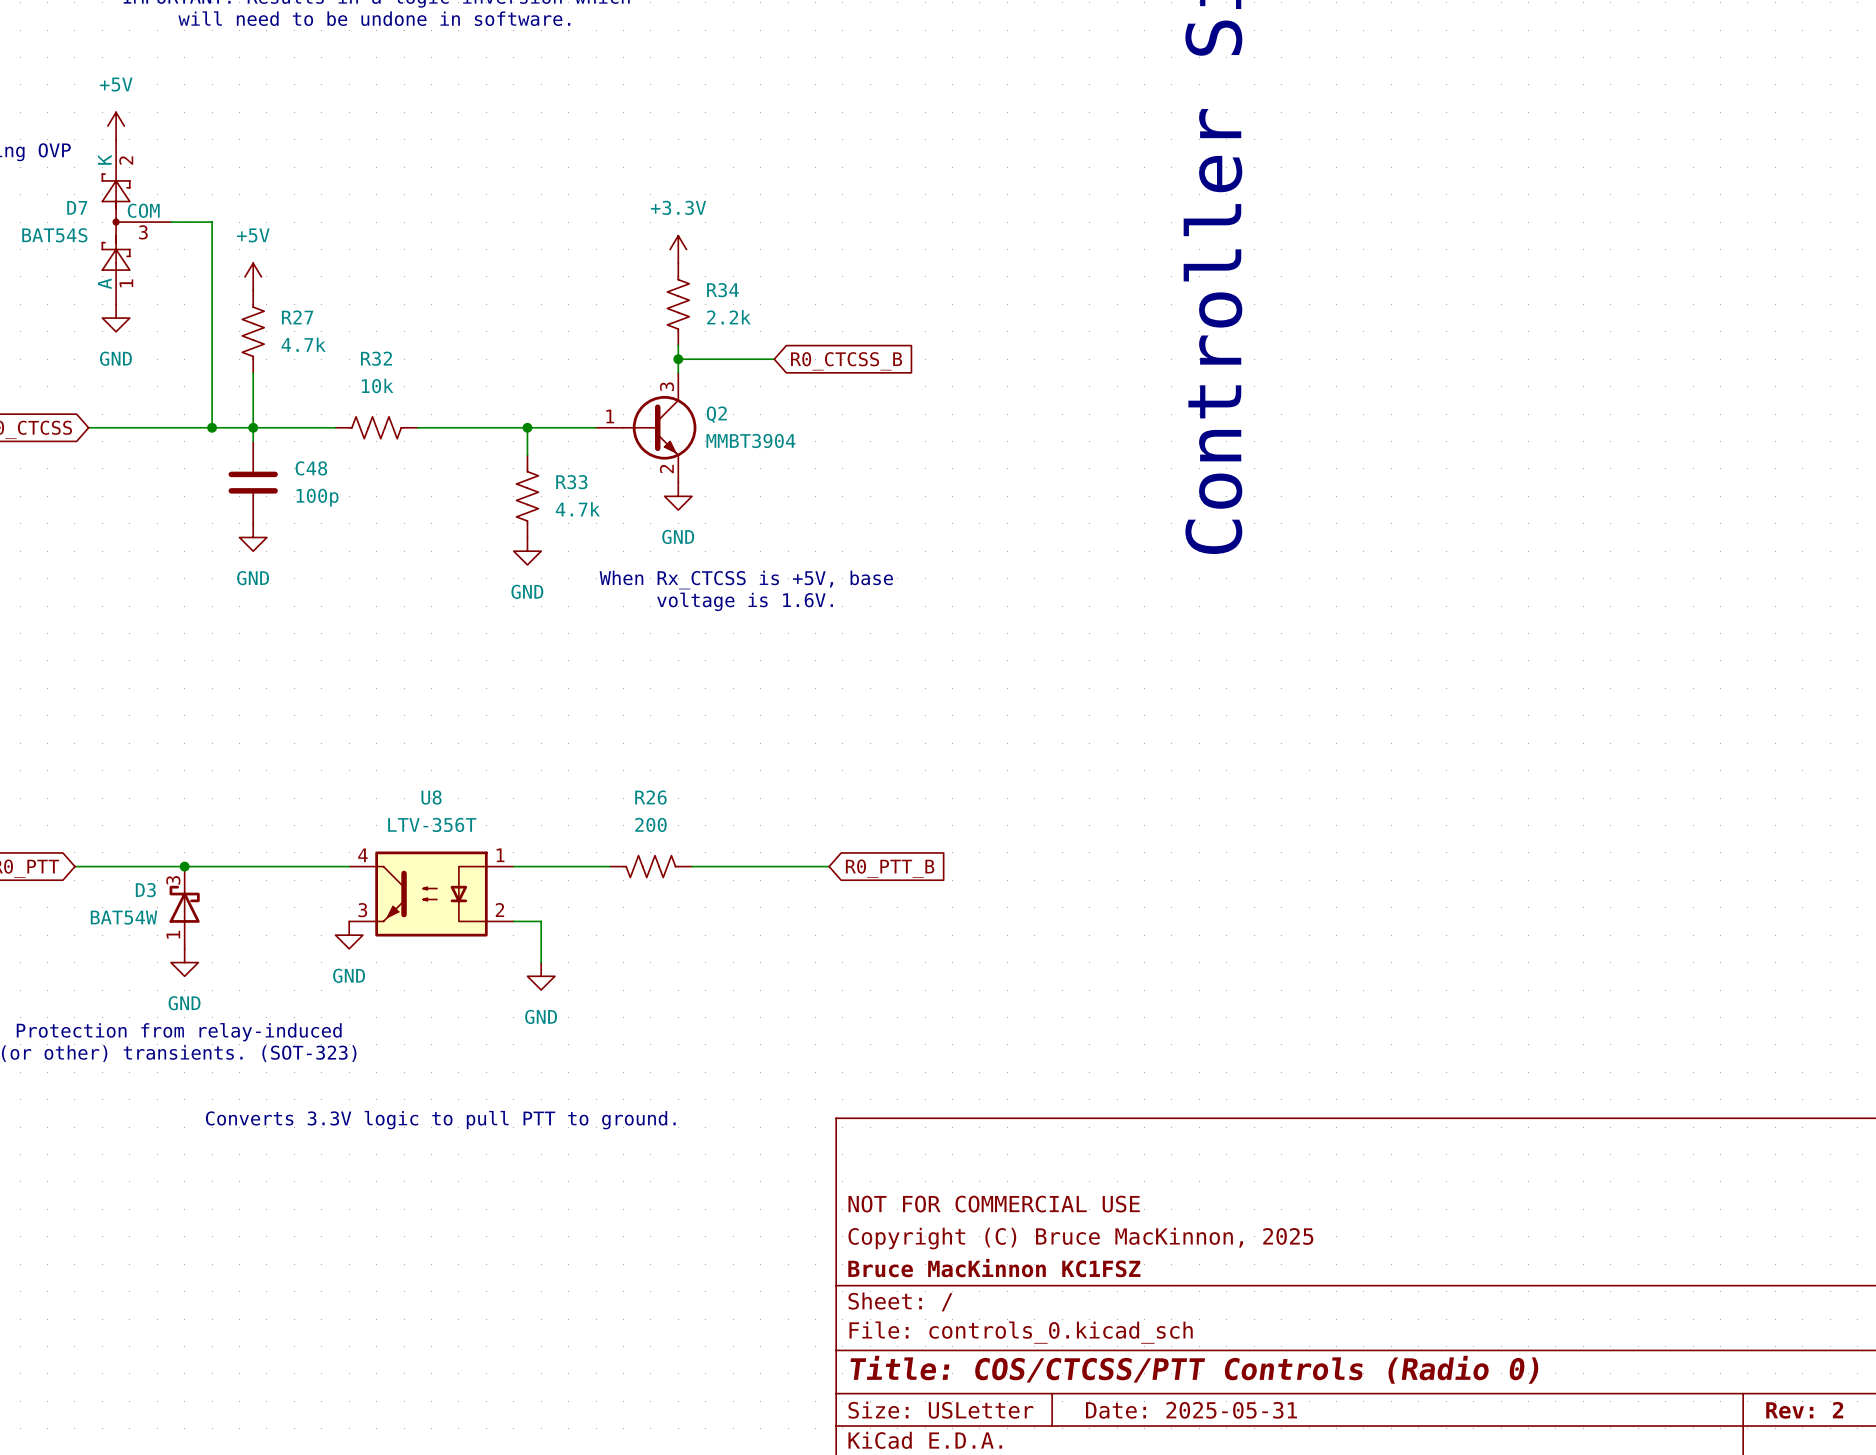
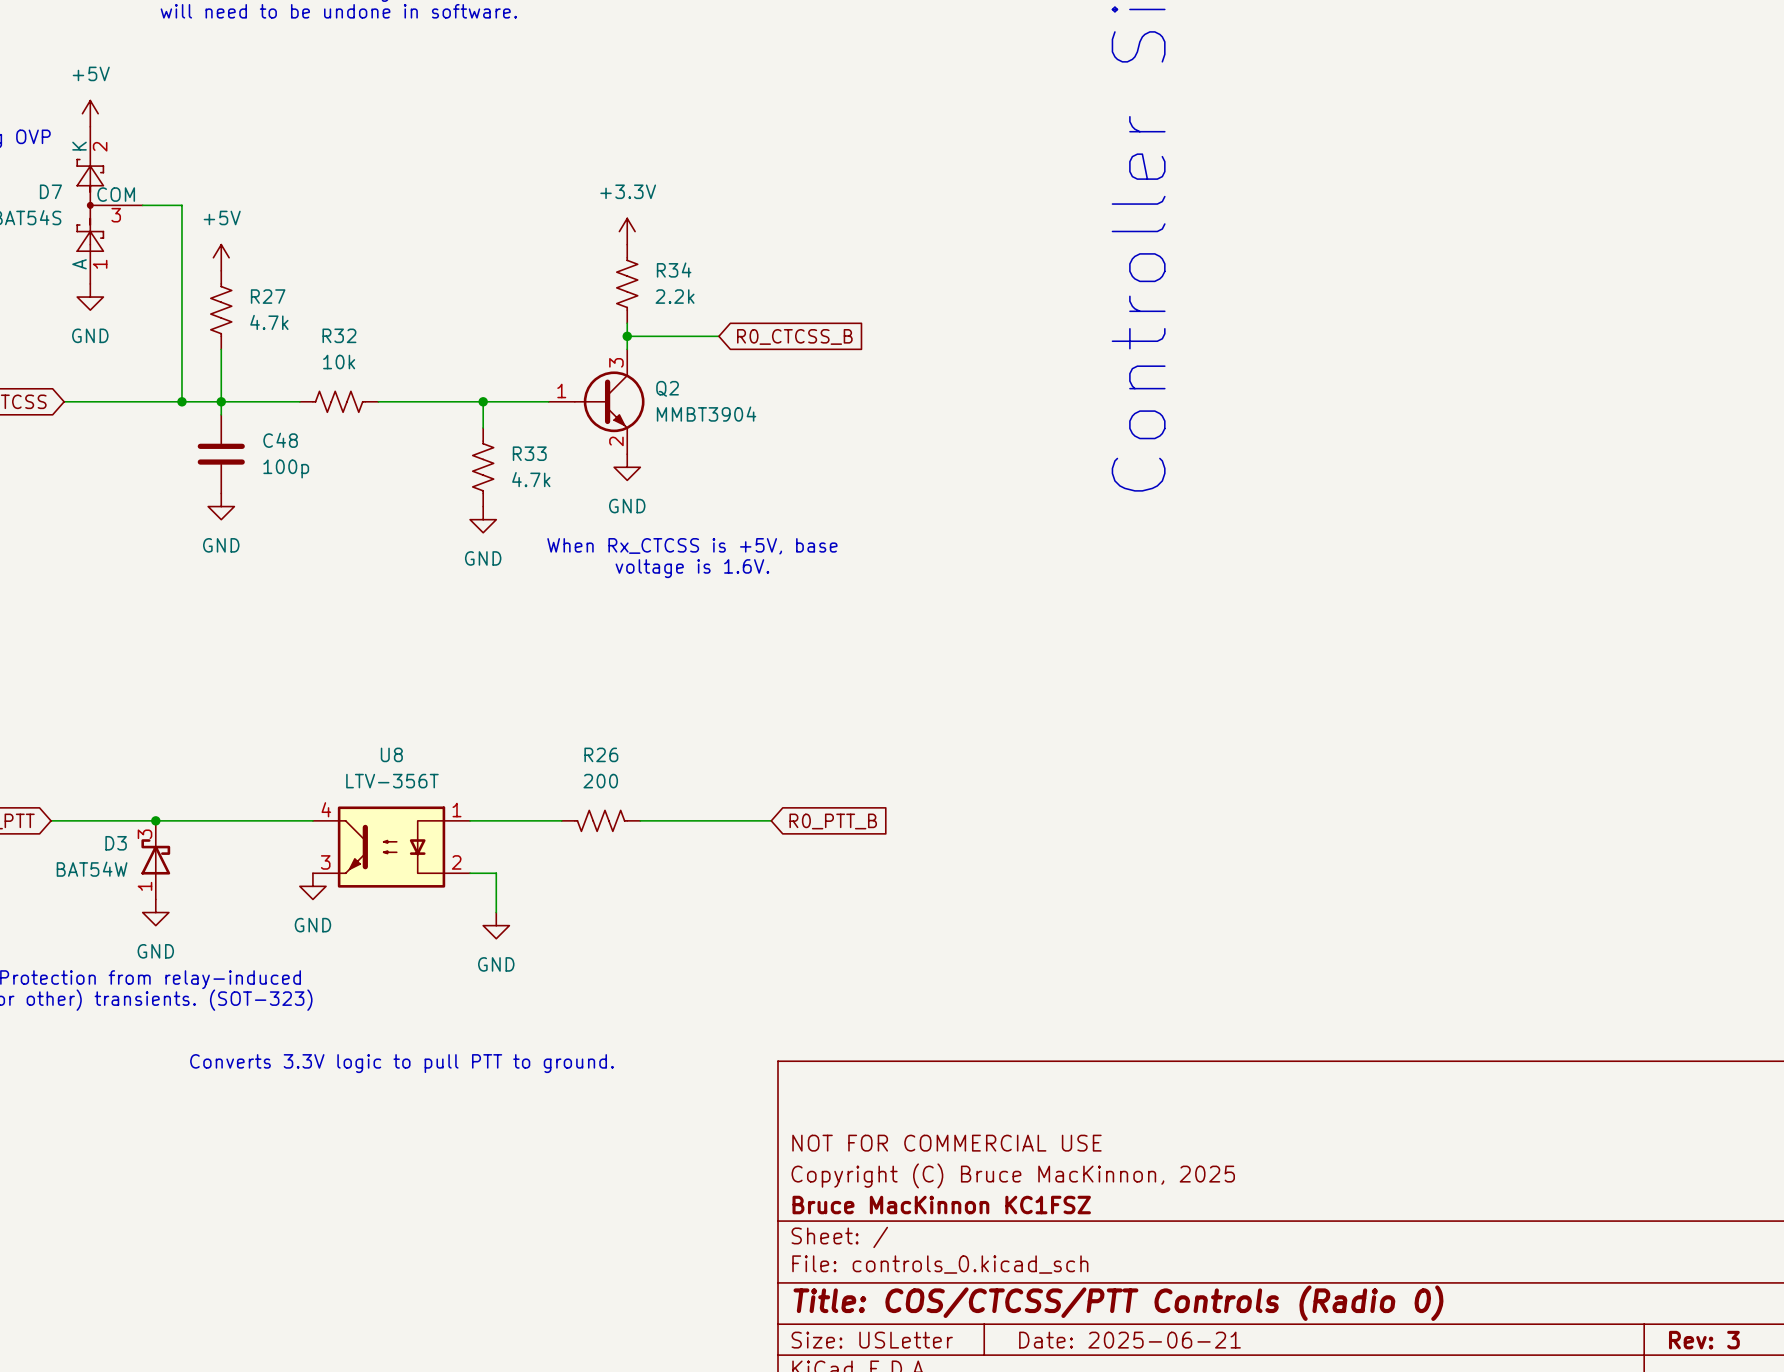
title block: Date: 2025-05-31 (1191, 1410) -> Date: 2025-06-21 (1129, 1340)
title block: Rev: 2 (1804, 1410) -> Rev: 3 (1704, 1340)

